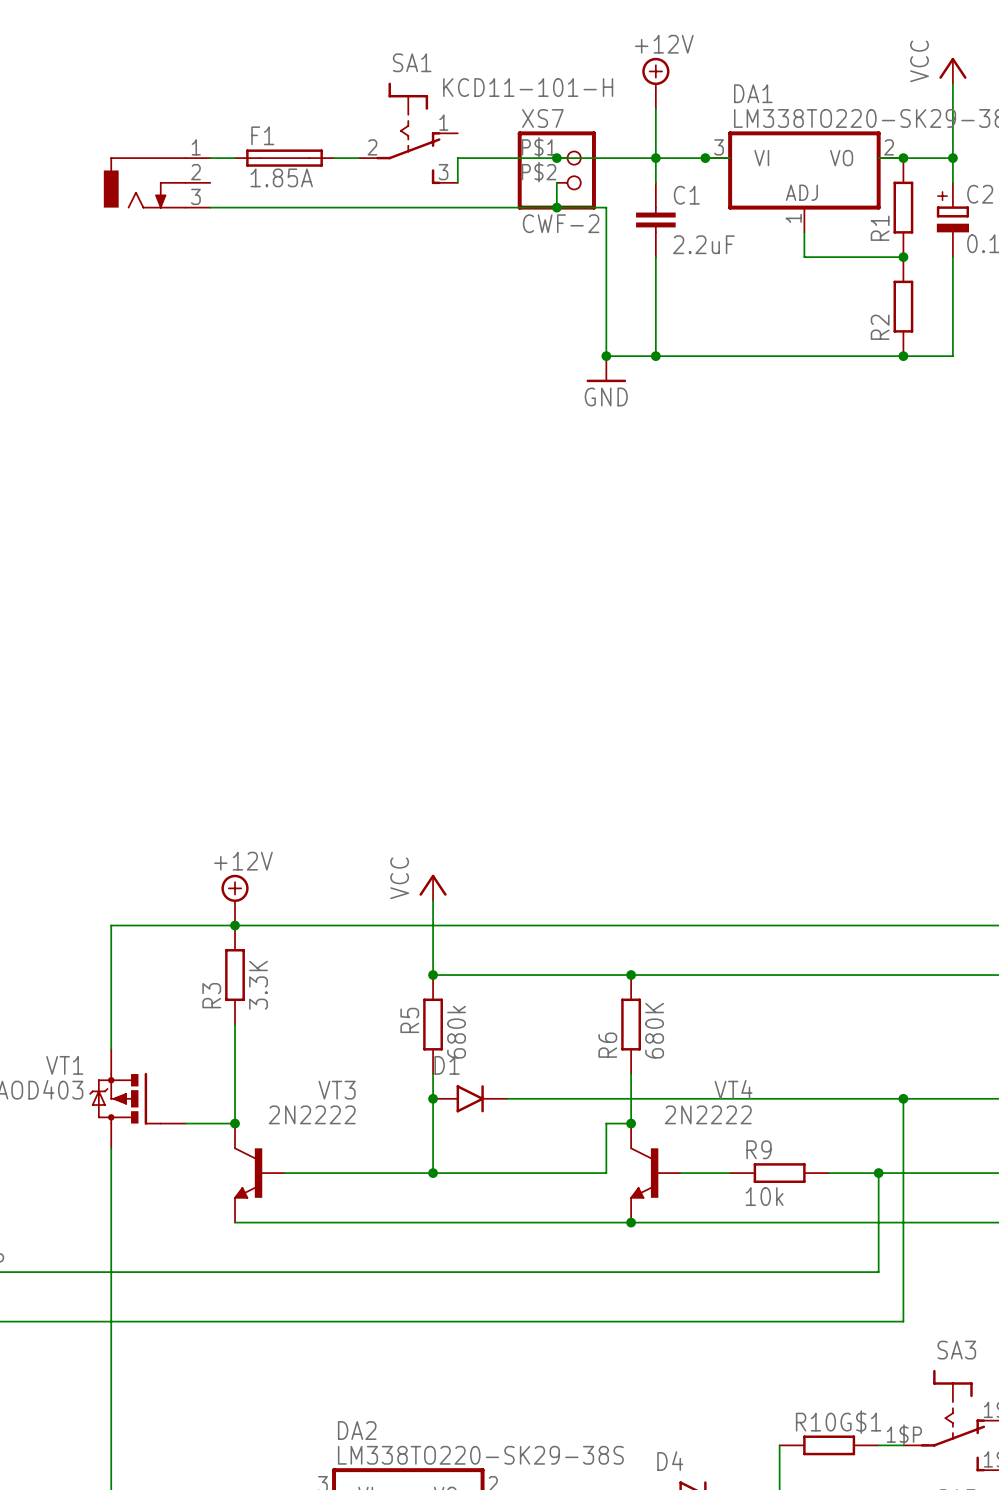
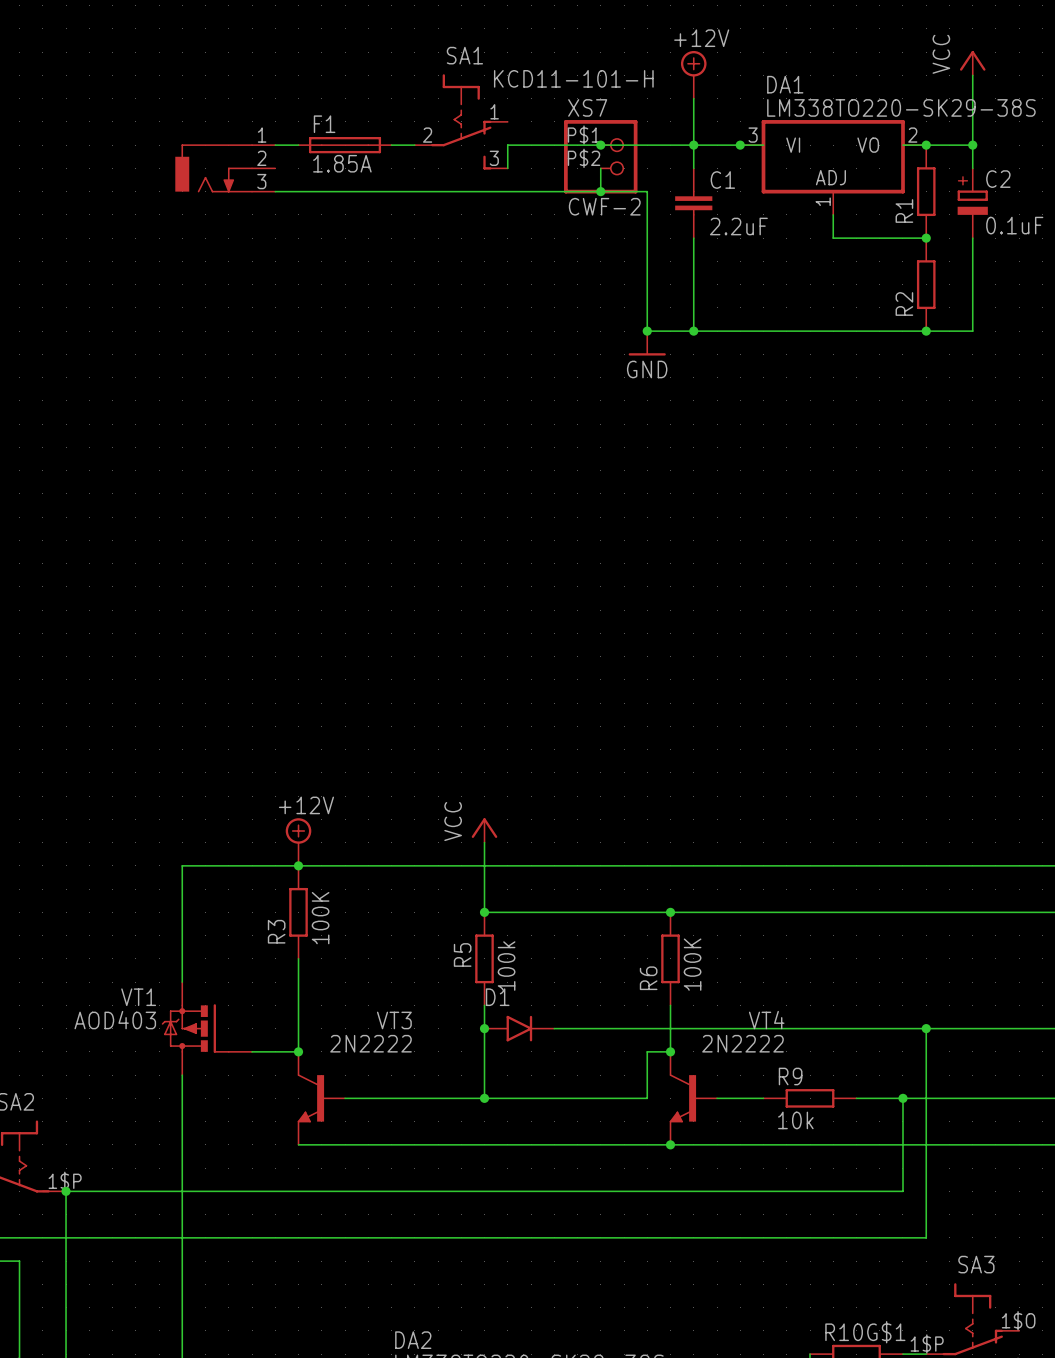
R3 value: 3.3K (258, 985) -> 100K (320, 918)
R6 value: 680K (654, 1030) -> 100K (692, 964)
R5 value: 680k (456, 1032) -> 100k (506, 966)

